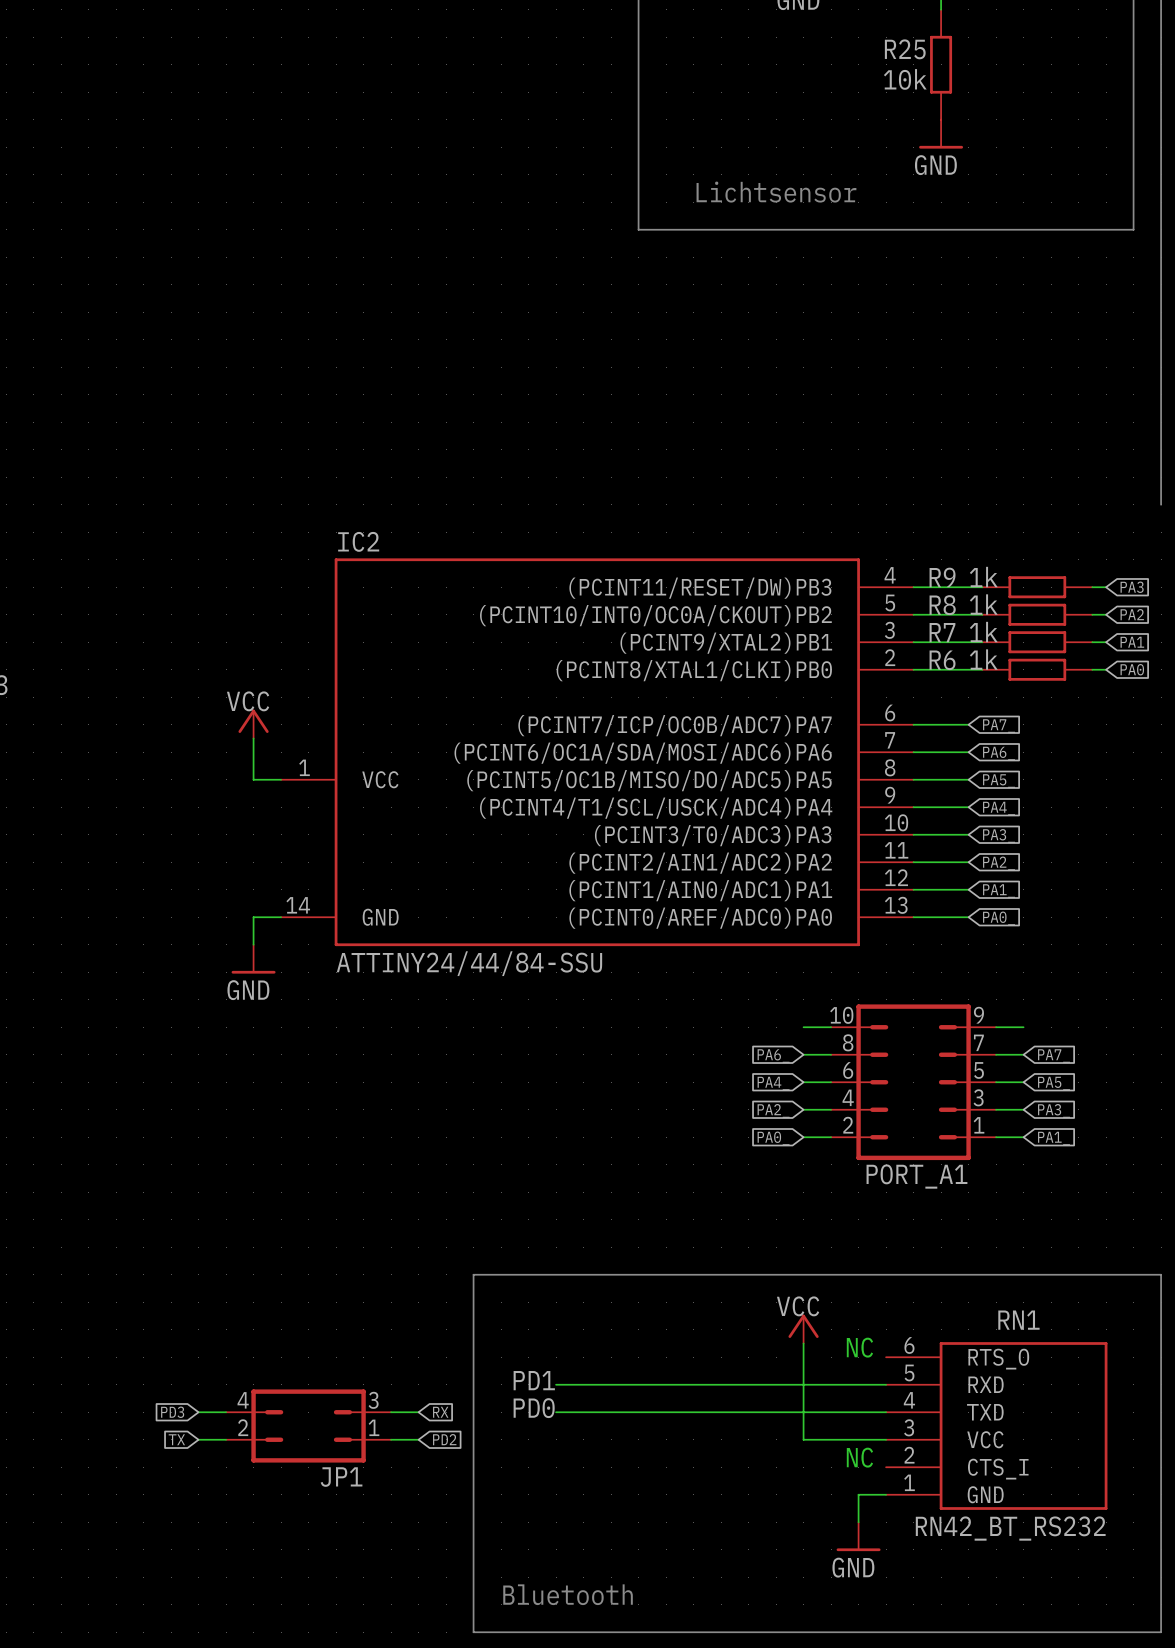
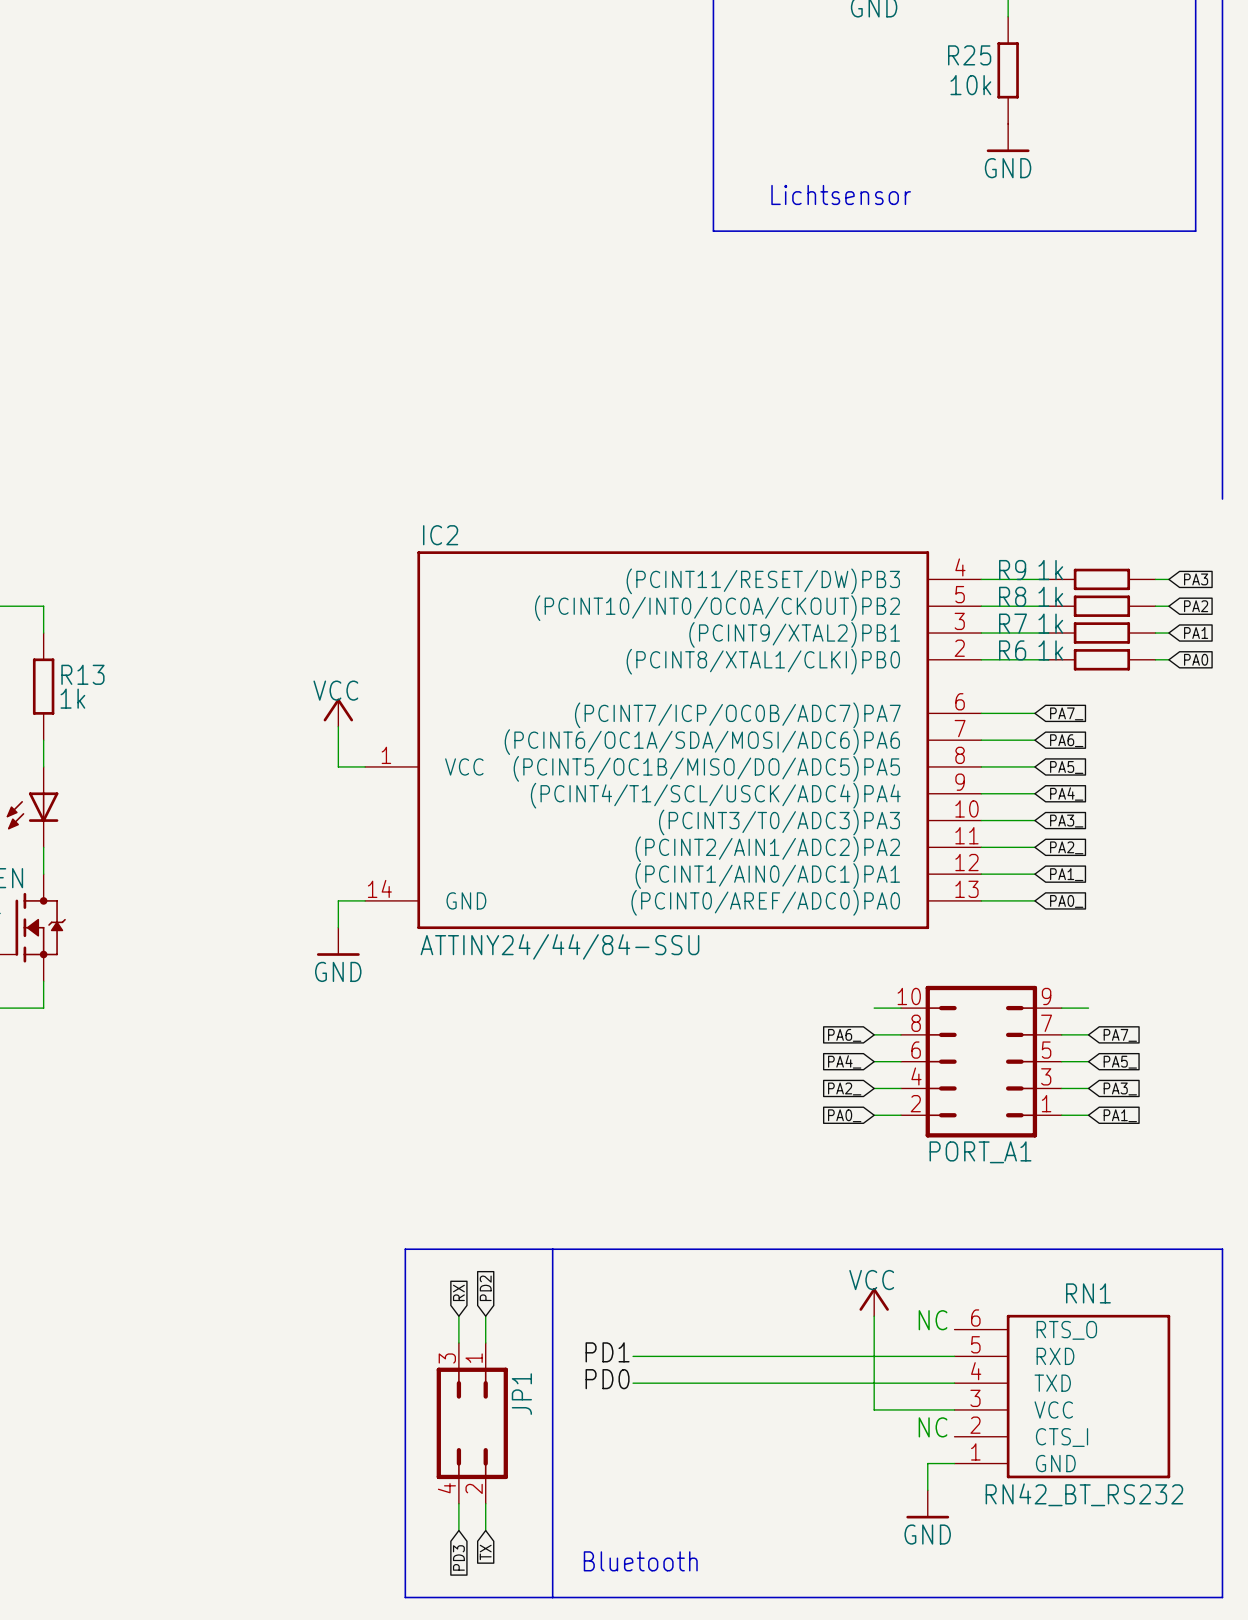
line: none -> (552, 1249) (405, 1249) (405, 1597) (552, 1597)
wire: none -> (458, 1316) (458, 1342)
wire: none -> (485, 1316) (485, 1342)
global label rotation: 0° (172, 1412) -> 90° counterclockwise (458, 1557)
global label position: PD3 (172, 1412) -> PD3 (458, 1557)
wire: (198, 1412) (226, 1412) -> none
wire: (391, 1412) (418, 1412) -> none
global label rotation: 0° (440, 1412) -> 90° counterclockwise (458, 1292)
global label position: RX (440, 1412) -> RX (458, 1292)
JP1 rotation: 0° (308, 1426) -> 90° counterclockwise (472, 1423)
global label rotation: 0° (176, 1439) -> 90° counterclockwise (485, 1552)
global label position: TX (176, 1439) -> TX (485, 1552)
wire: (198, 1439) (226, 1439) -> none
wire: (391, 1439) (418, 1439) -> none
global label rotation: 0° (444, 1439) -> 90° counterclockwise (485, 1288)
global label position: PD2 (444, 1439) -> PD2 (485, 1288)
wire: none -> (458, 1503) (458, 1530)
wire: none -> (485, 1503) (485, 1530)

